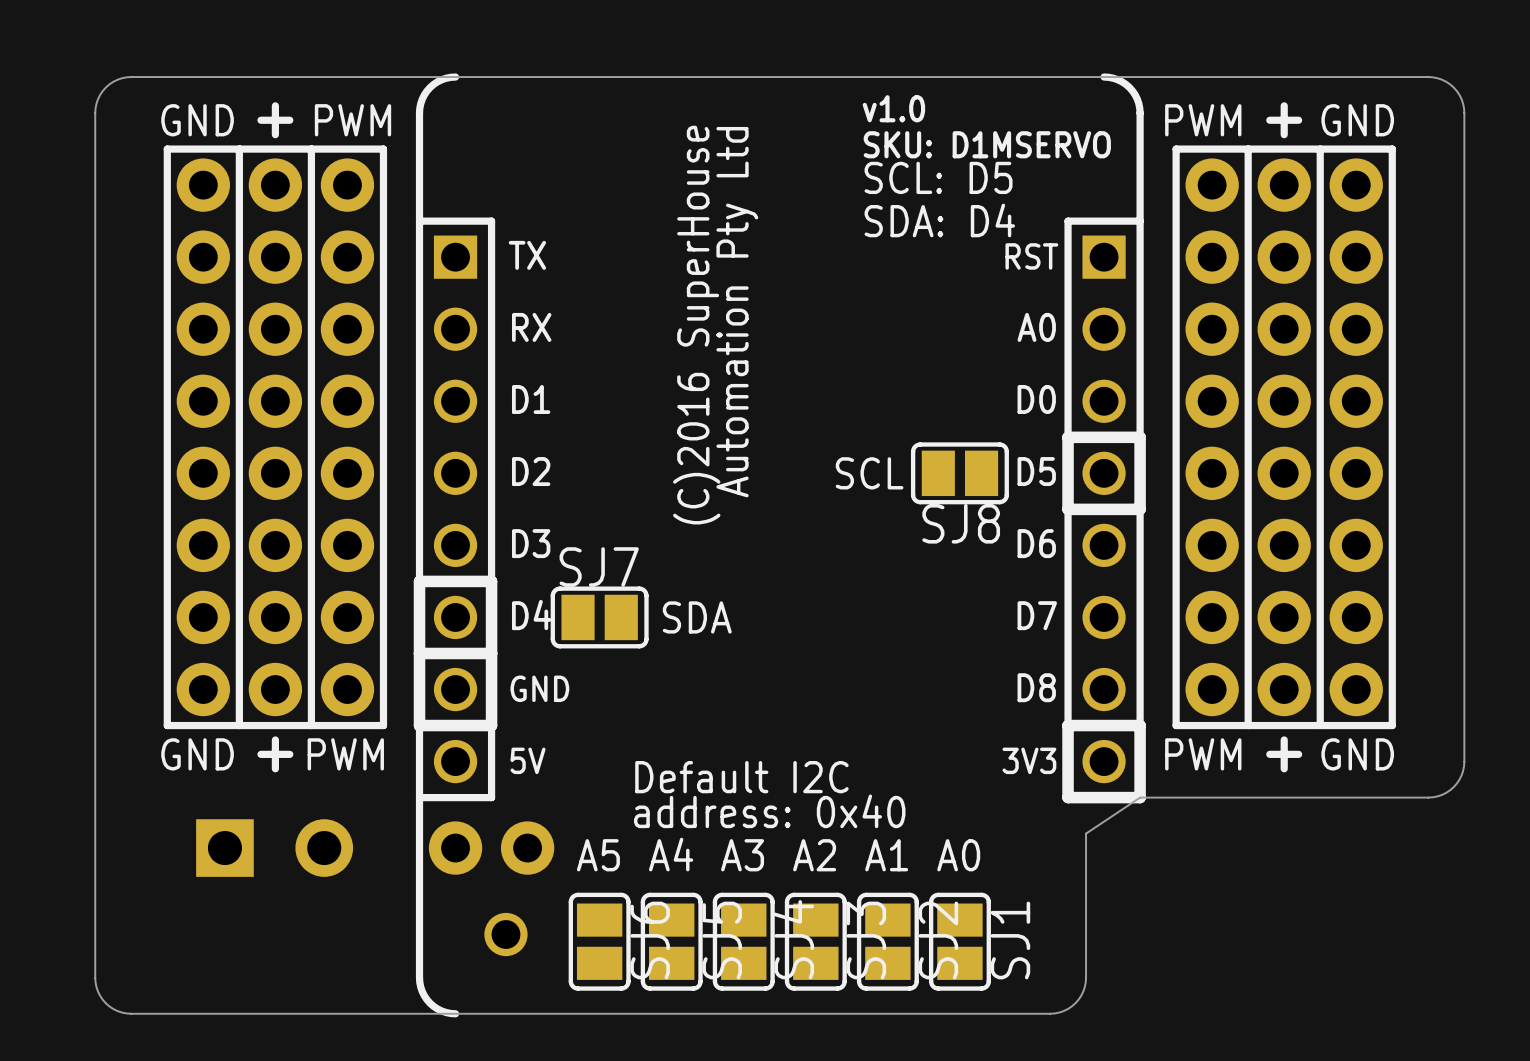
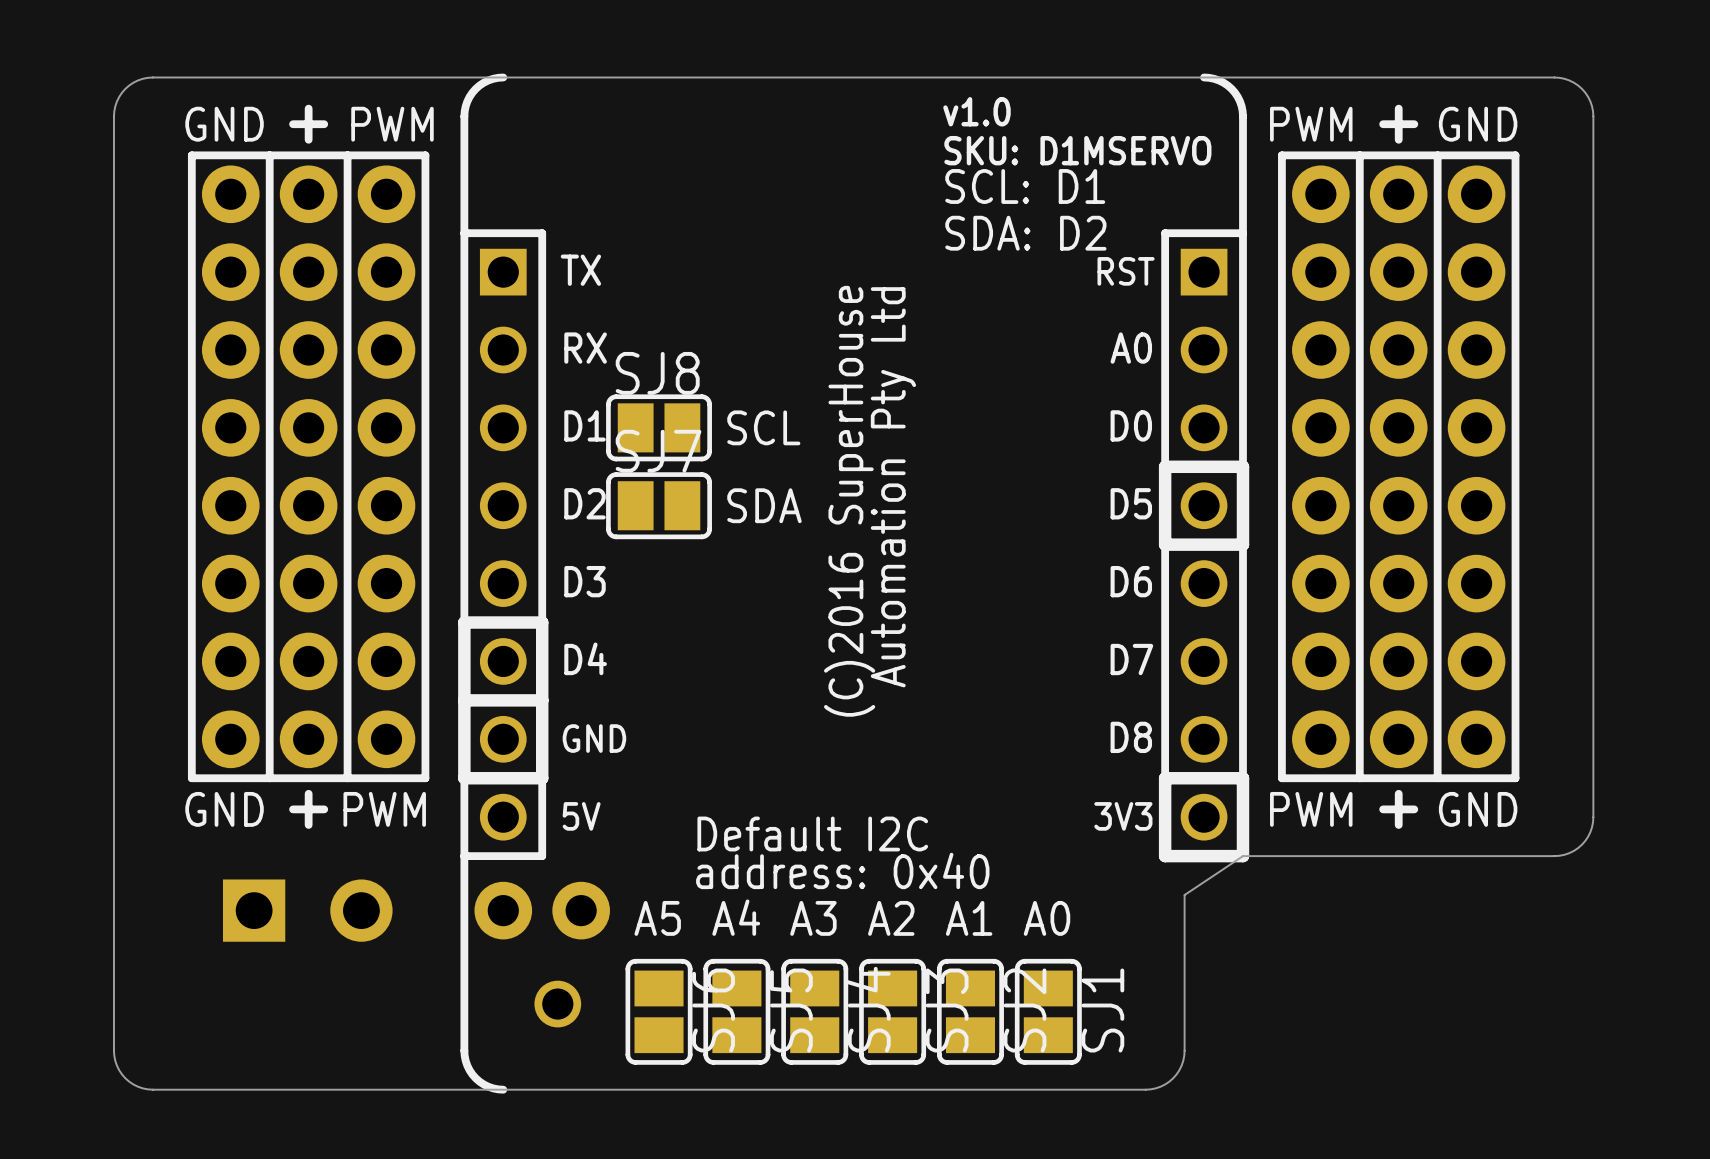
text: SCL: D5 (938, 177) -> SCL: D1 (1025, 186)
text: SDA: D4 (939, 220) -> SDA: D2 (1025, 233)
text position: Automation Pty Ltd (737, 312) -> Automation Pty Ltd (893, 487)
text position: (C)2016 SuperHouse (696, 325) -> (C)2016 SuperHouse (849, 501)
text position: SCL (869, 473) -> SCL (763, 427)
SJ8 position: (959, 473) -> (659, 427)
SJ8 name position: SJ8 (961, 523) -> SJ8 (657, 373)
SJ7 position: (599, 617) -> (659, 505)
text position: SDA (697, 617) -> SDA (764, 505)

